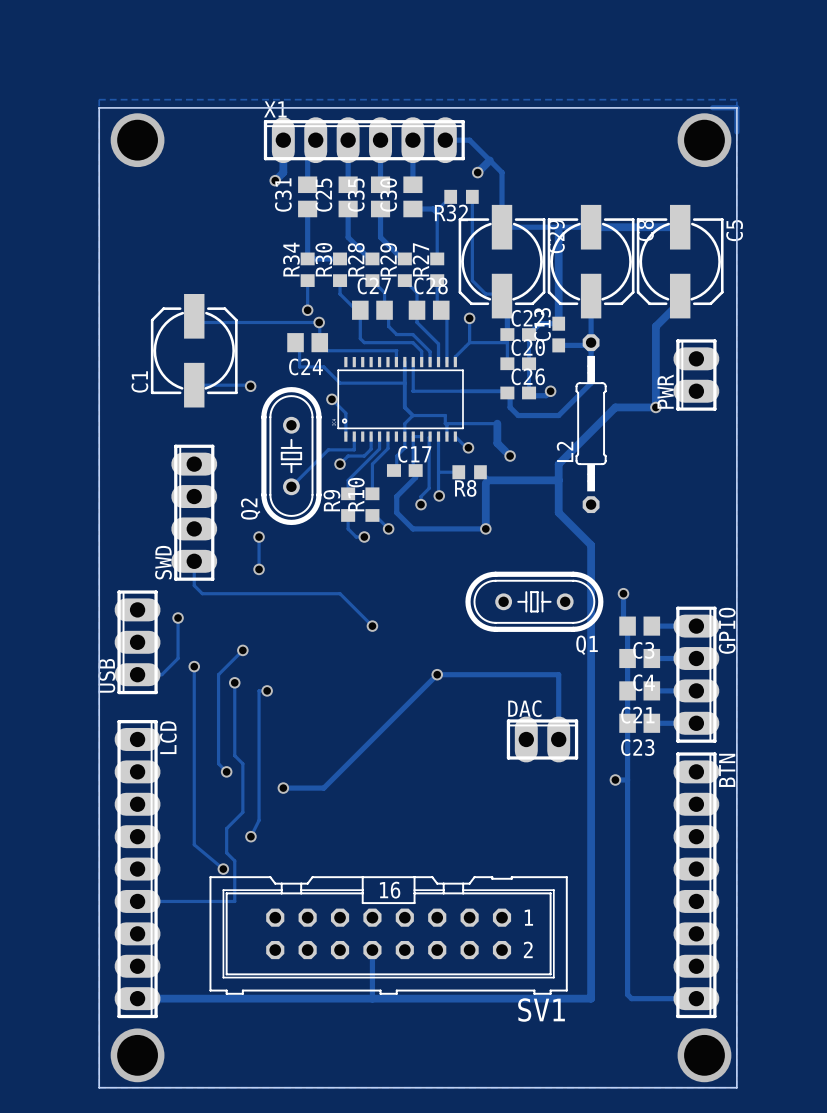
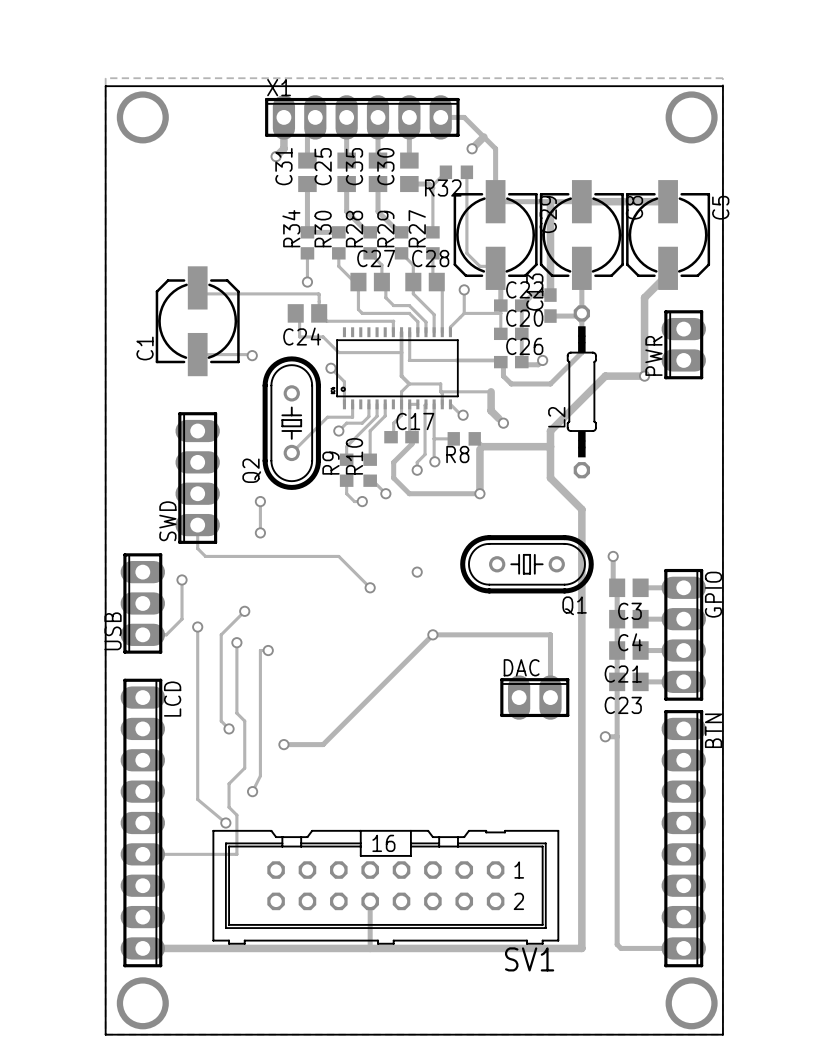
track: (712, 107) (736, 107) (736, 132) -> none
via: (319, 322) -> none
via: none -> (417, 572)

